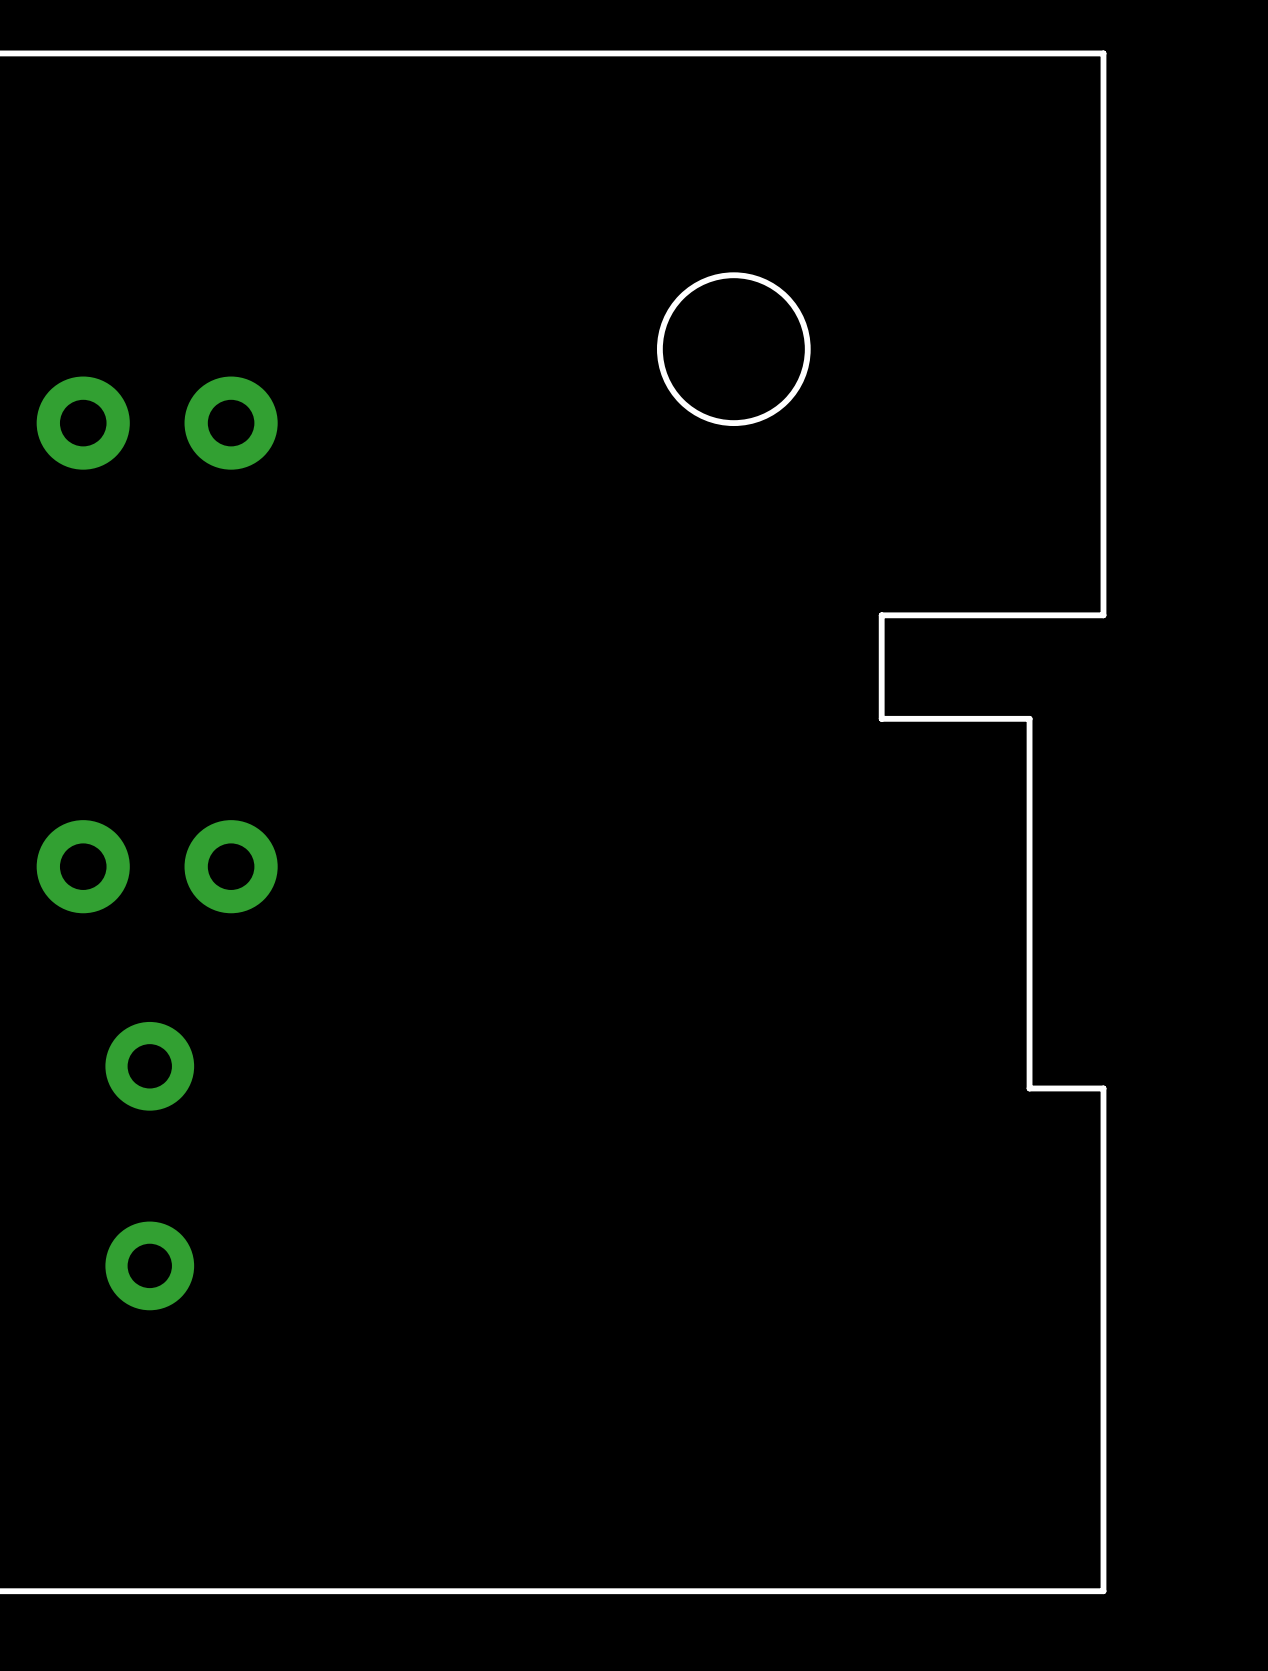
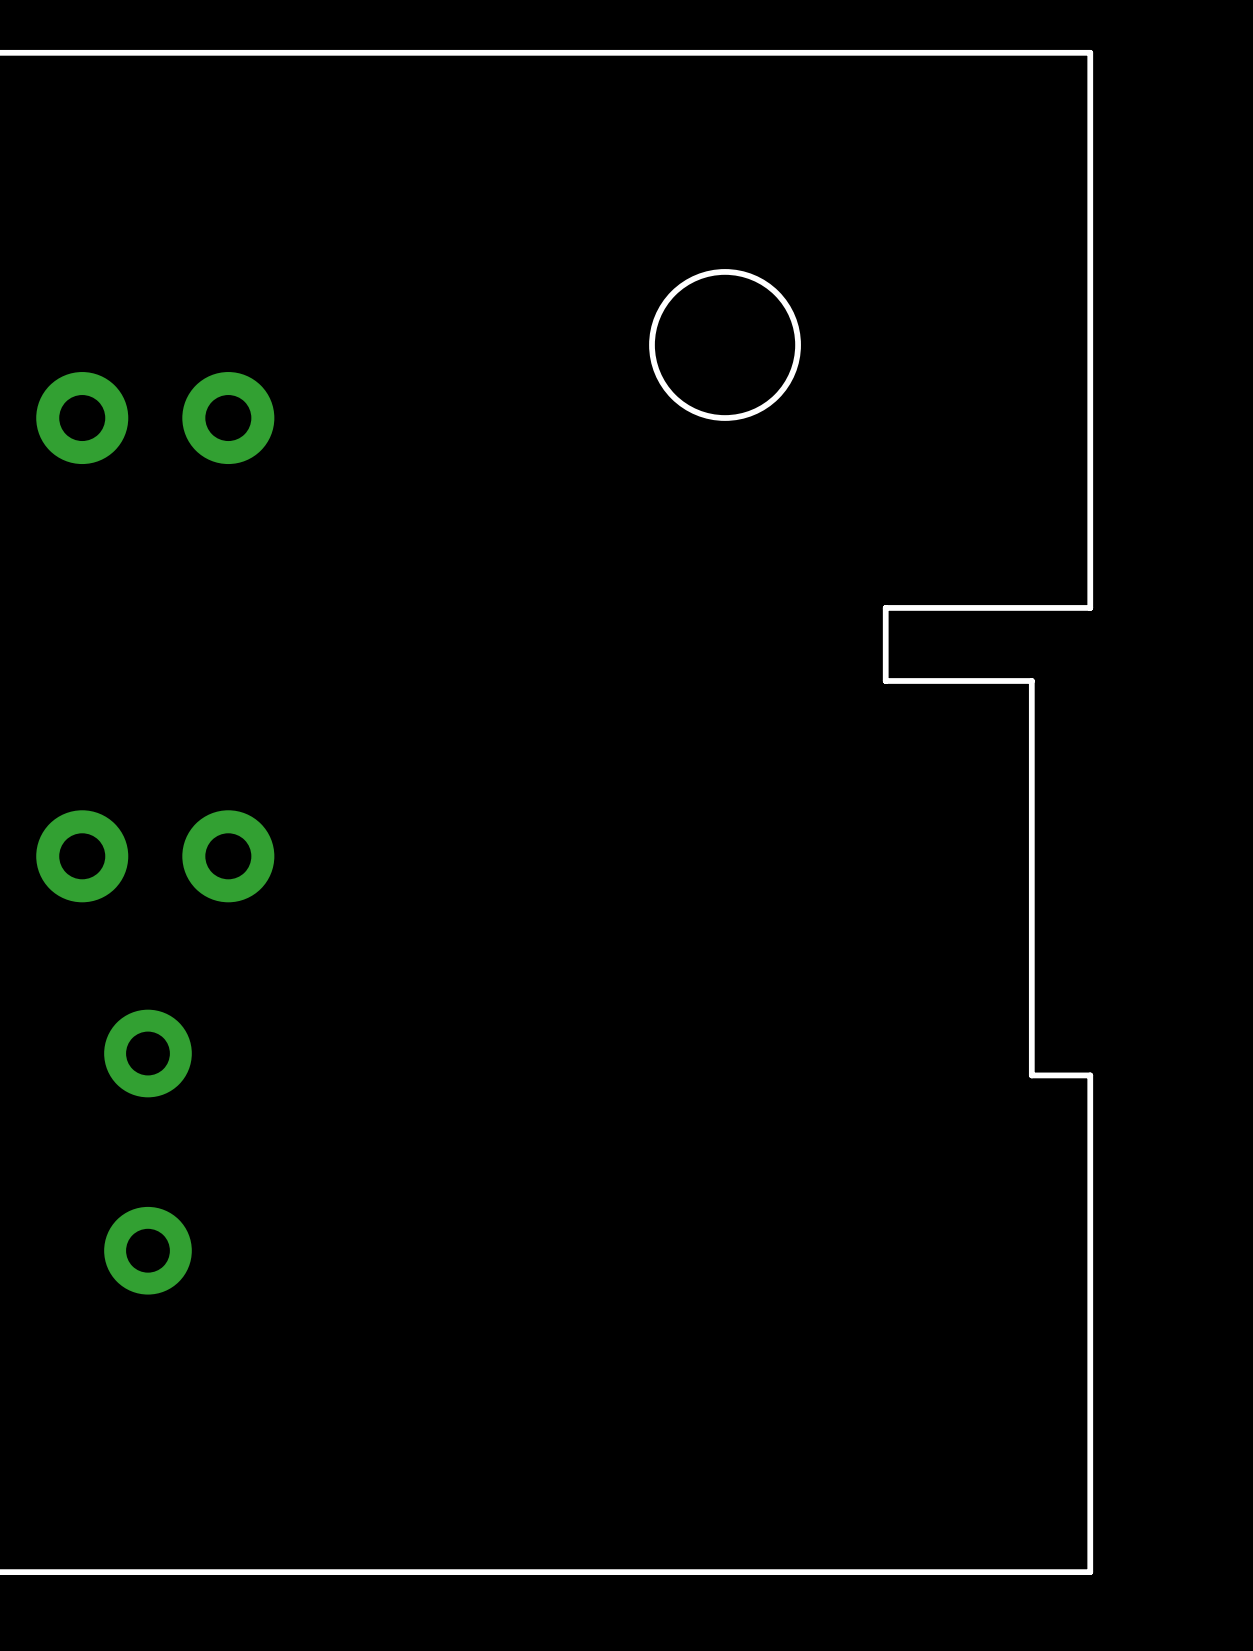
board edge: (896, 615) (881, 615) (881, 718) (1029, 718) (1029, 1088) (1044, 1088) -> (885, 607) (885, 680) (1031, 680) (1031, 1075)

